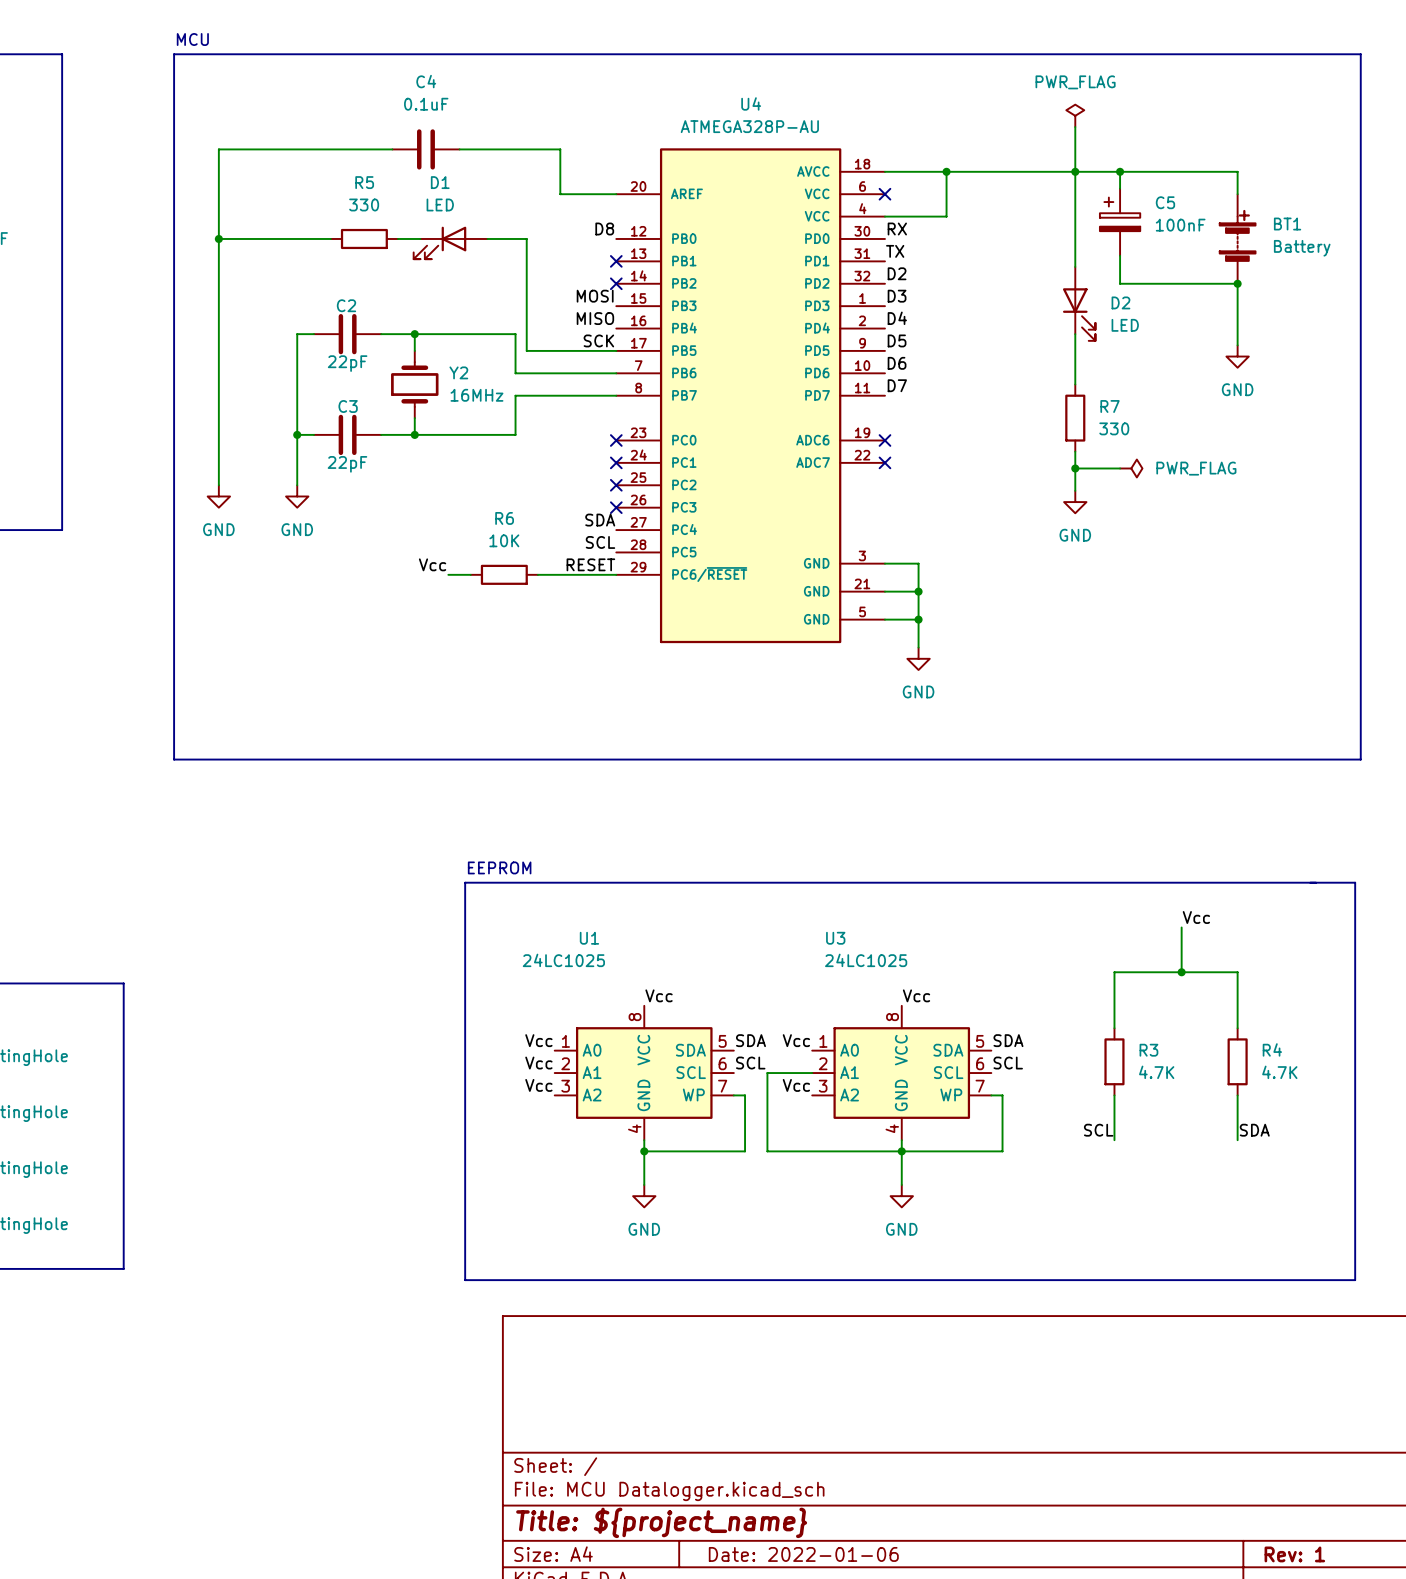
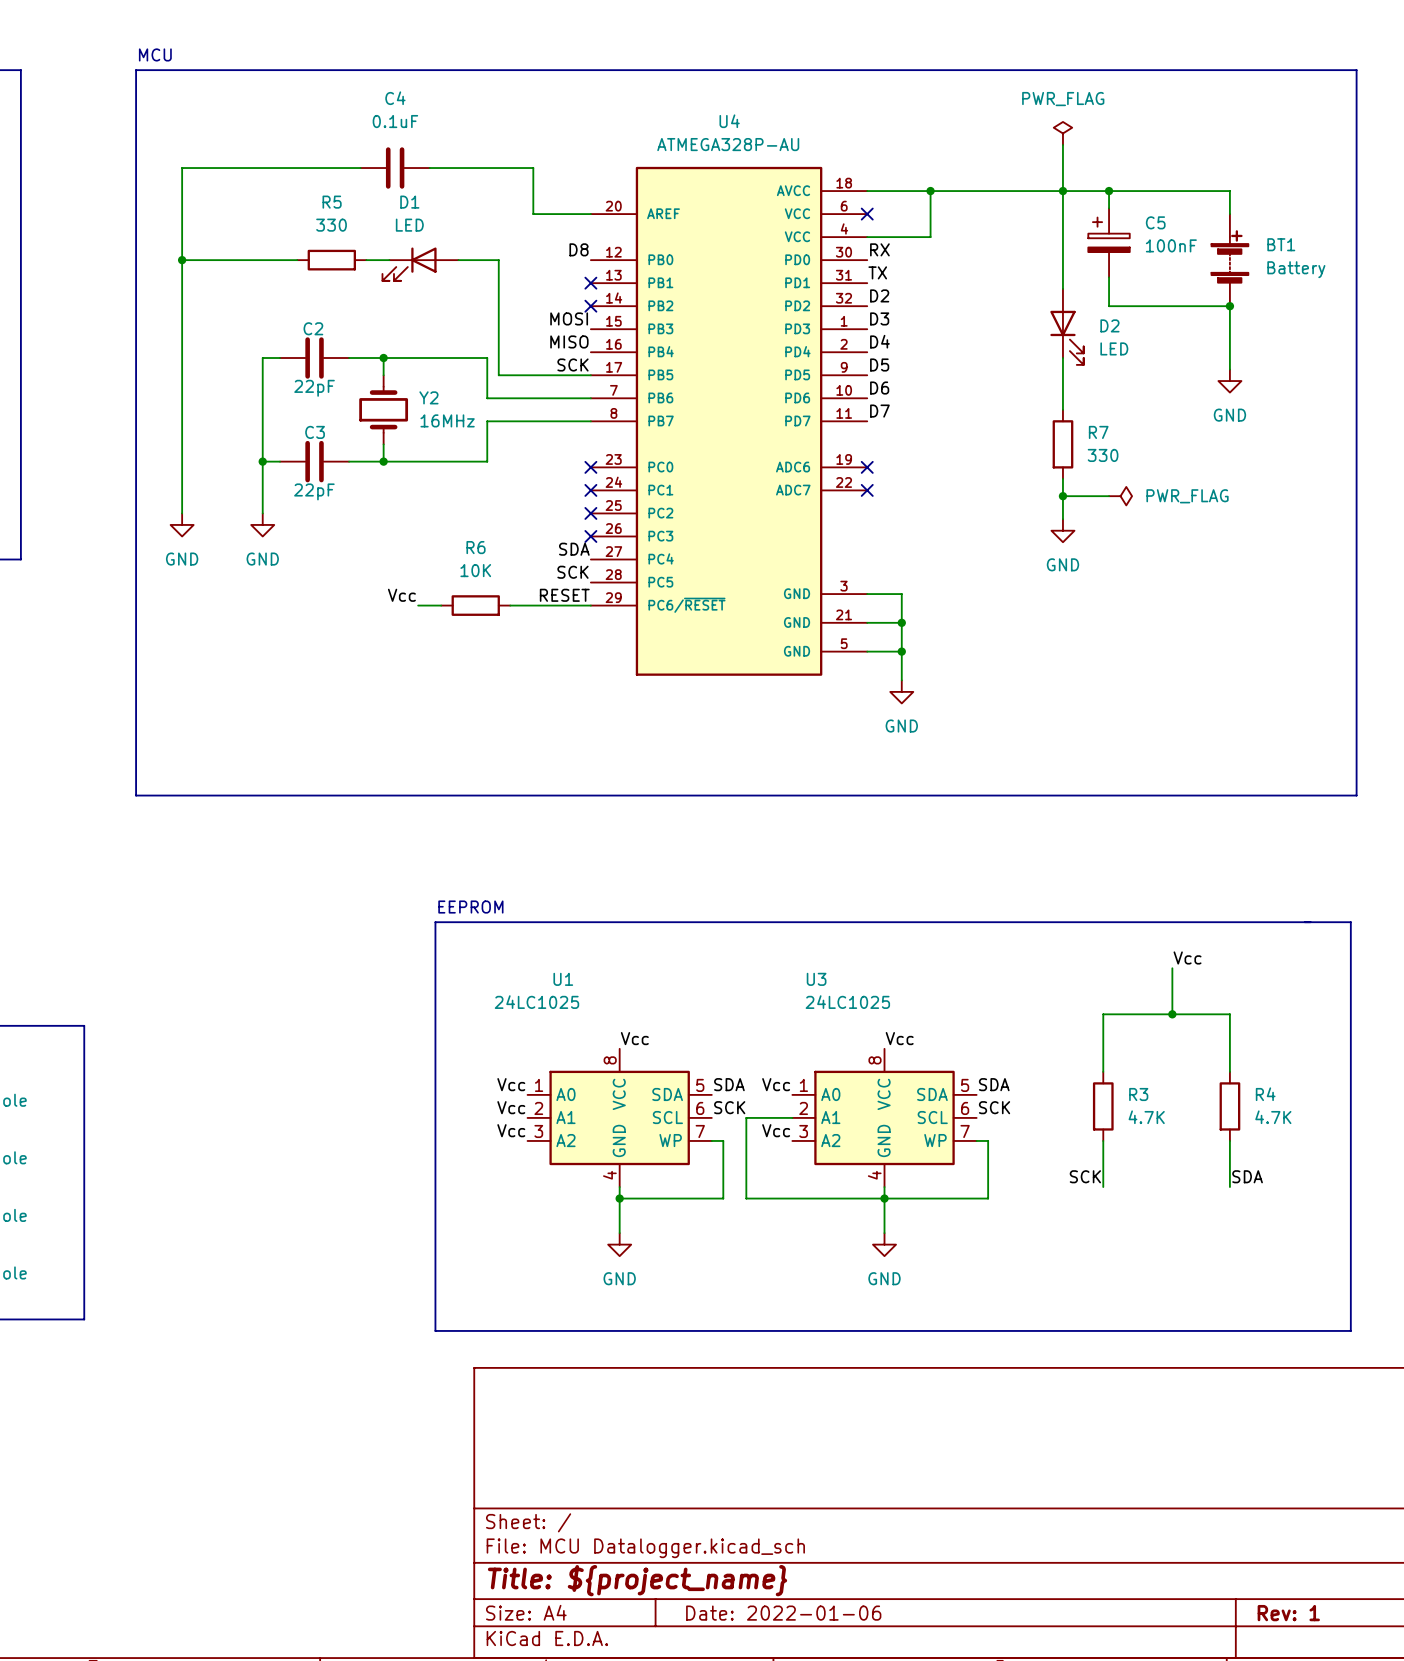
label: SCL (600, 542) -> SCK (572, 572)
label: SCL (750, 1063) -> SCK (729, 1107)
label: SCL (1008, 1063) -> SCK (994, 1107)
label: SCL (1098, 1130) -> SCK (1085, 1176)

